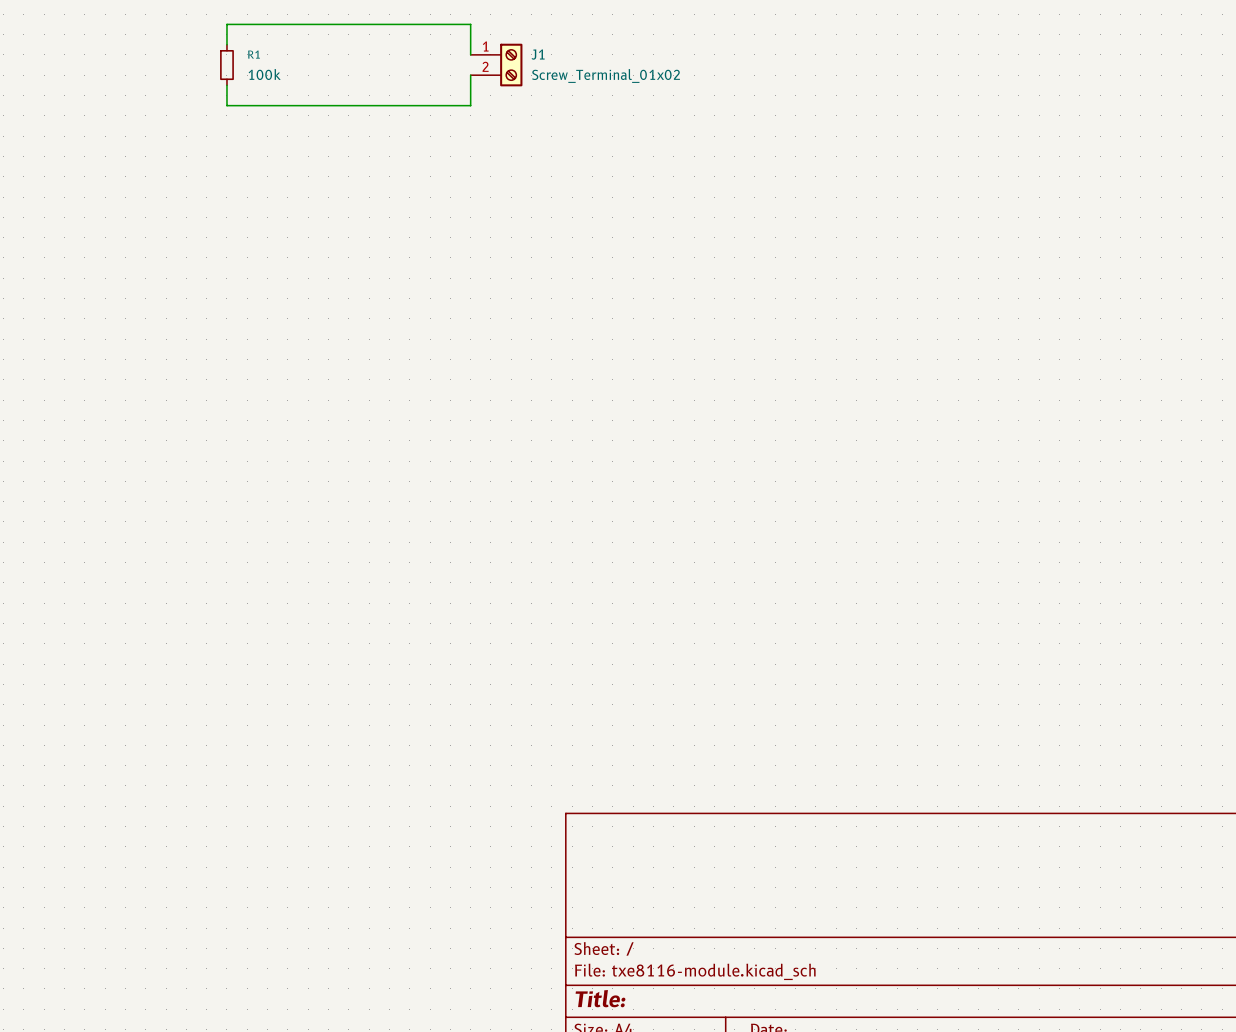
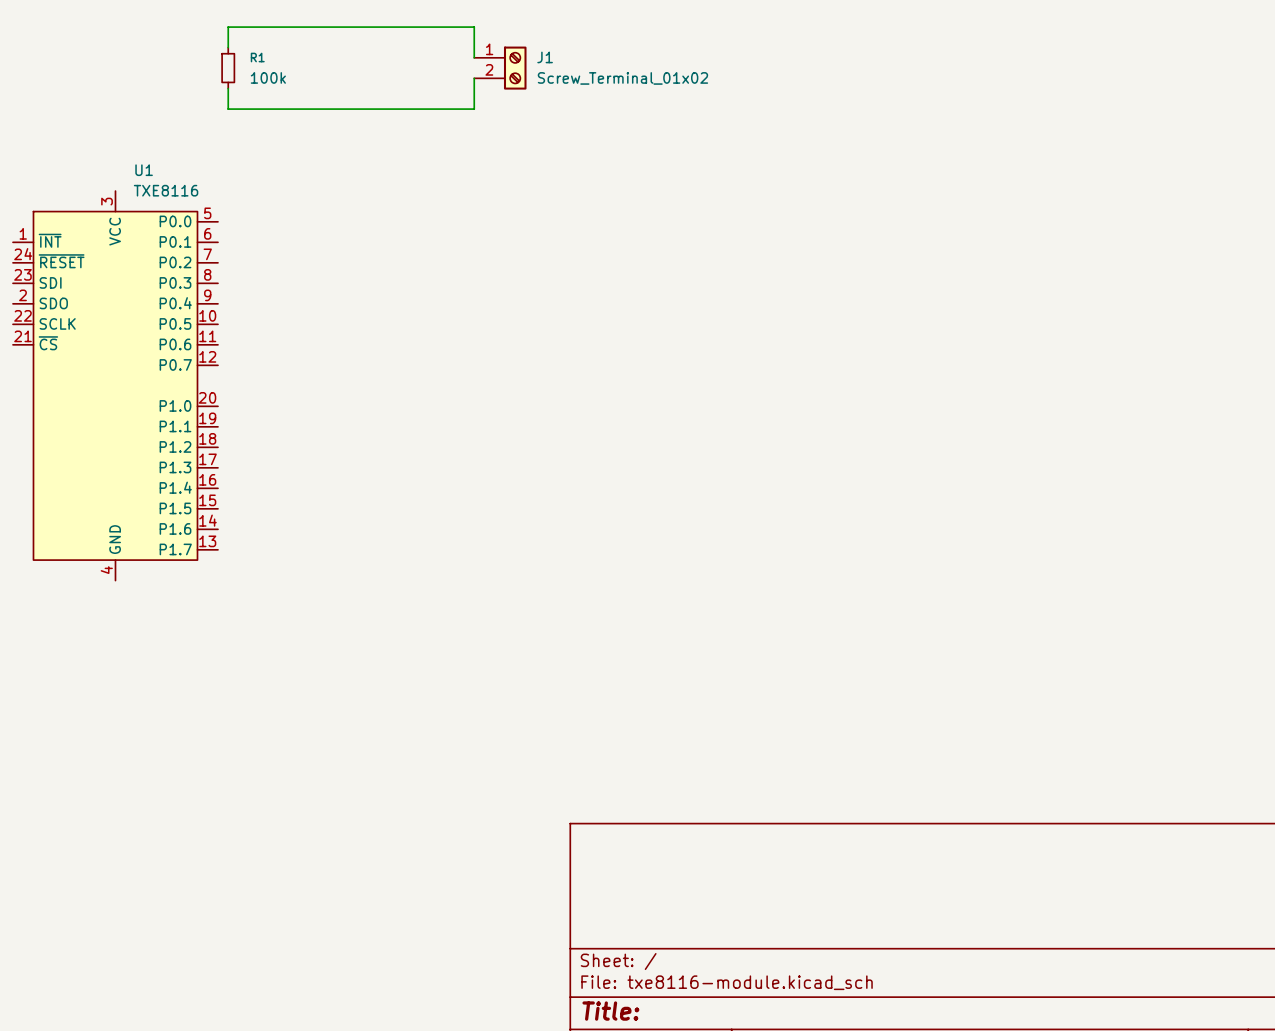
U1: none -> TXE8116 (115, 385)

